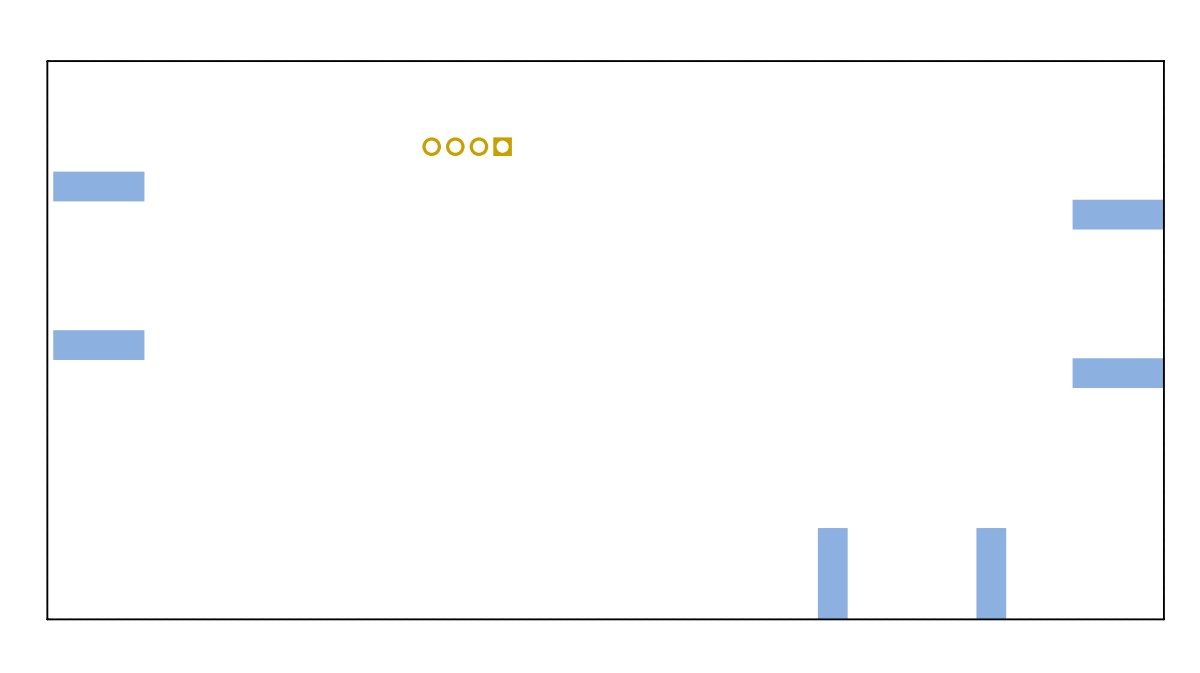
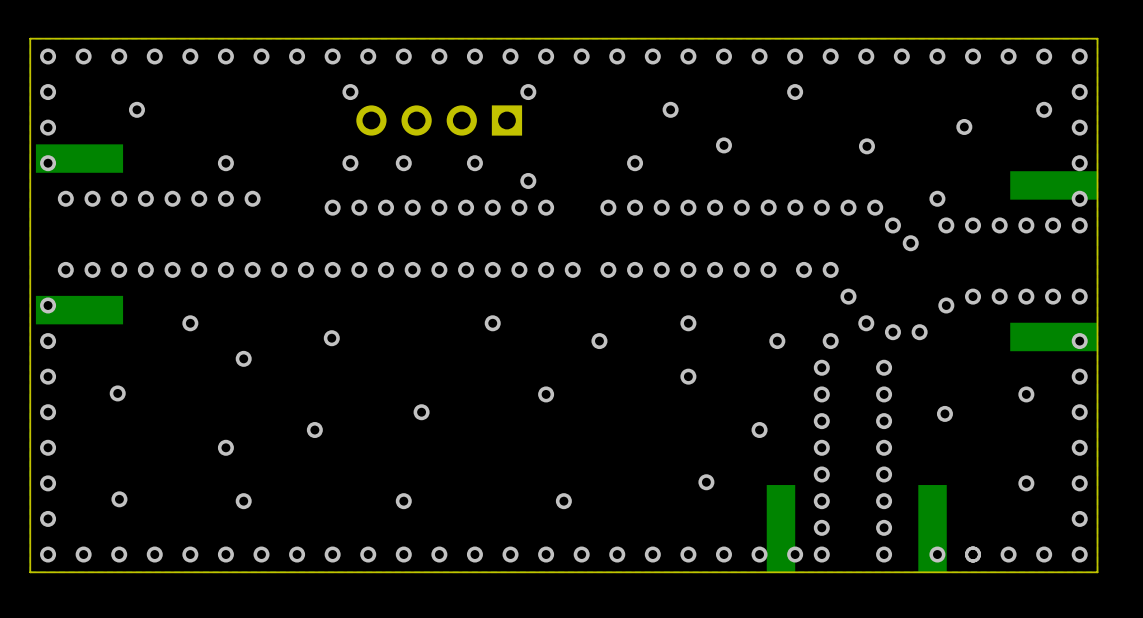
via: none -> (48, 56)
via: none -> (83, 56)
via: none -> (119, 56)
via: none -> (154, 56)
via: none -> (190, 56)
via: none -> (225, 56)
via: none -> (261, 56)
via: none -> (297, 56)
via: none -> (332, 56)
via: none -> (368, 56)
via: none -> (403, 56)
via: none -> (439, 56)
via: none -> (474, 56)
via: none -> (510, 56)
via: none -> (546, 56)
via: none -> (581, 56)
via: none -> (617, 56)
via: none -> (652, 56)
via: none -> (688, 56)
via: none -> (723, 56)
via: none -> (759, 56)
via: none -> (795, 56)
via: none -> (830, 56)
via: none -> (866, 56)
via: none -> (901, 56)
via: none -> (937, 56)
via: none -> (973, 56)
via: none -> (1008, 56)
via: none -> (1044, 56)
via: none -> (1079, 56)
via: none -> (48, 92)
via: none -> (350, 92)
via: none -> (528, 92)
via: none -> (795, 92)
via: none -> (1079, 92)
via: none -> (136, 109)
via: none -> (670, 109)
via: none -> (1044, 109)
part footprint: [422, 137, 512, 157] -> [356, 105, 523, 136]
via: none -> (964, 126)
via: none -> (48, 127)
via: none -> (1079, 127)
via: none -> (723, 145)
via: none -> (866, 146)
via: none -> (48, 163)
via: none -> (225, 163)
via: none -> (350, 163)
via: none -> (403, 163)
via: none -> (474, 163)
via: none -> (635, 163)
via: none -> (1079, 163)
via: none -> (528, 180)
via: none -> (65, 198)
via: none -> (92, 198)
via: none -> (119, 198)
via: none -> (145, 198)
via: none -> (172, 198)
via: none -> (199, 198)
via: none -> (225, 198)
via: none -> (252, 198)
via: none -> (937, 198)
via: none -> (1079, 198)
via: none -> (332, 207)
via: none -> (359, 207)
via: none -> (386, 207)
via: none -> (412, 207)
via: none -> (439, 207)
via: none -> (466, 207)
via: none -> (492, 207)
via: none -> (519, 207)
via: none -> (546, 207)
via: none -> (608, 207)
via: none -> (635, 207)
via: none -> (661, 207)
via: none -> (688, 207)
via: none -> (715, 207)
via: none -> (741, 207)
via: none -> (768, 207)
via: none -> (795, 207)
via: none -> (821, 207)
via: none -> (848, 207)
via: none -> (875, 207)
via: none -> (892, 225)
via: none -> (946, 225)
via: none -> (973, 225)
via: none -> (999, 225)
via: none -> (1026, 225)
via: none -> (1053, 225)
via: none -> (1079, 225)
via: none -> (910, 243)
via: none -> (65, 269)
via: none -> (92, 269)
via: none -> (119, 269)
via: none -> (145, 269)
via: none -> (172, 269)
via: none -> (199, 269)
via: none -> (225, 269)
via: none -> (252, 269)
via: none -> (279, 269)
via: none -> (305, 269)
via: none -> (332, 269)
via: none -> (359, 269)
via: none -> (386, 269)
via: none -> (412, 269)
via: none -> (439, 269)
via: none -> (466, 269)
via: none -> (492, 269)
via: none -> (519, 269)
via: none -> (546, 269)
via: none -> (572, 269)
via: none -> (608, 269)
via: none -> (635, 269)
via: none -> (661, 269)
via: none -> (688, 269)
via: none -> (715, 269)
via: none -> (741, 269)
via: none -> (768, 269)
via: none -> (804, 269)
via: none -> (830, 269)
via: none -> (848, 296)
via: none -> (973, 296)
via: none -> (999, 296)
via: none -> (1026, 296)
via: none -> (1053, 296)
via: none -> (1079, 296)
via: none -> (48, 305)
via: none -> (946, 305)
via: none -> (190, 323)
via: none -> (492, 323)
via: none -> (688, 323)
via: none -> (866, 323)
via: none -> (892, 332)
via: none -> (919, 332)
via: none -> (331, 338)
via: none -> (48, 341)
via: none -> (599, 341)
via: none -> (777, 341)
via: none -> (830, 341)
via: none -> (1079, 341)
via: none -> (243, 358)
via: none -> (821, 367)
via: none -> (884, 367)
via: none -> (48, 376)
via: none -> (688, 376)
via: none -> (1079, 376)
via: none -> (117, 393)
via: none -> (546, 394)
via: none -> (821, 394)
via: none -> (884, 394)
via: none -> (1026, 394)
via: none -> (48, 412)
via: none -> (421, 412)
via: none -> (1079, 412)
via: none -> (944, 413)
via: none -> (821, 421)
via: none -> (884, 421)
via: none -> (314, 430)
via: none -> (759, 430)
via: none -> (48, 447)
via: none -> (225, 447)
via: none -> (821, 447)
via: none -> (884, 447)
via: none -> (1079, 447)
via: none -> (821, 474)
via: none -> (884, 474)
via: none -> (706, 482)
via: none -> (48, 483)
via: none -> (1026, 483)
via: none -> (1079, 483)
via: none -> (119, 499)
via: none -> (243, 501)
via: none -> (403, 501)
via: none -> (563, 501)
via: none -> (821, 501)
via: none -> (884, 501)
via: none -> (48, 518)
via: none -> (1079, 518)
via: none -> (821, 527)
via: none -> (884, 527)
via: none -> (48, 554)
via: none -> (83, 554)
via: none -> (119, 554)
via: none -> (154, 554)
via: none -> (190, 554)
via: none -> (225, 554)
via: none -> (261, 554)
via: none -> (297, 554)
via: none -> (332, 554)
via: none -> (368, 554)
via: none -> (403, 554)
via: none -> (439, 554)
via: none -> (474, 554)
via: none -> (510, 554)
via: none -> (546, 554)
via: none -> (581, 554)
via: none -> (617, 554)
via: none -> (652, 554)
via: none -> (688, 554)
via: none -> (723, 554)
via: none -> (759, 554)
via: none -> (795, 554)
via: none -> (821, 554)
via: none -> (884, 554)
via: none -> (937, 554)
via: none -> (973, 554)
via: none -> (1008, 554)
via: none -> (1044, 554)
via: none -> (1079, 554)

